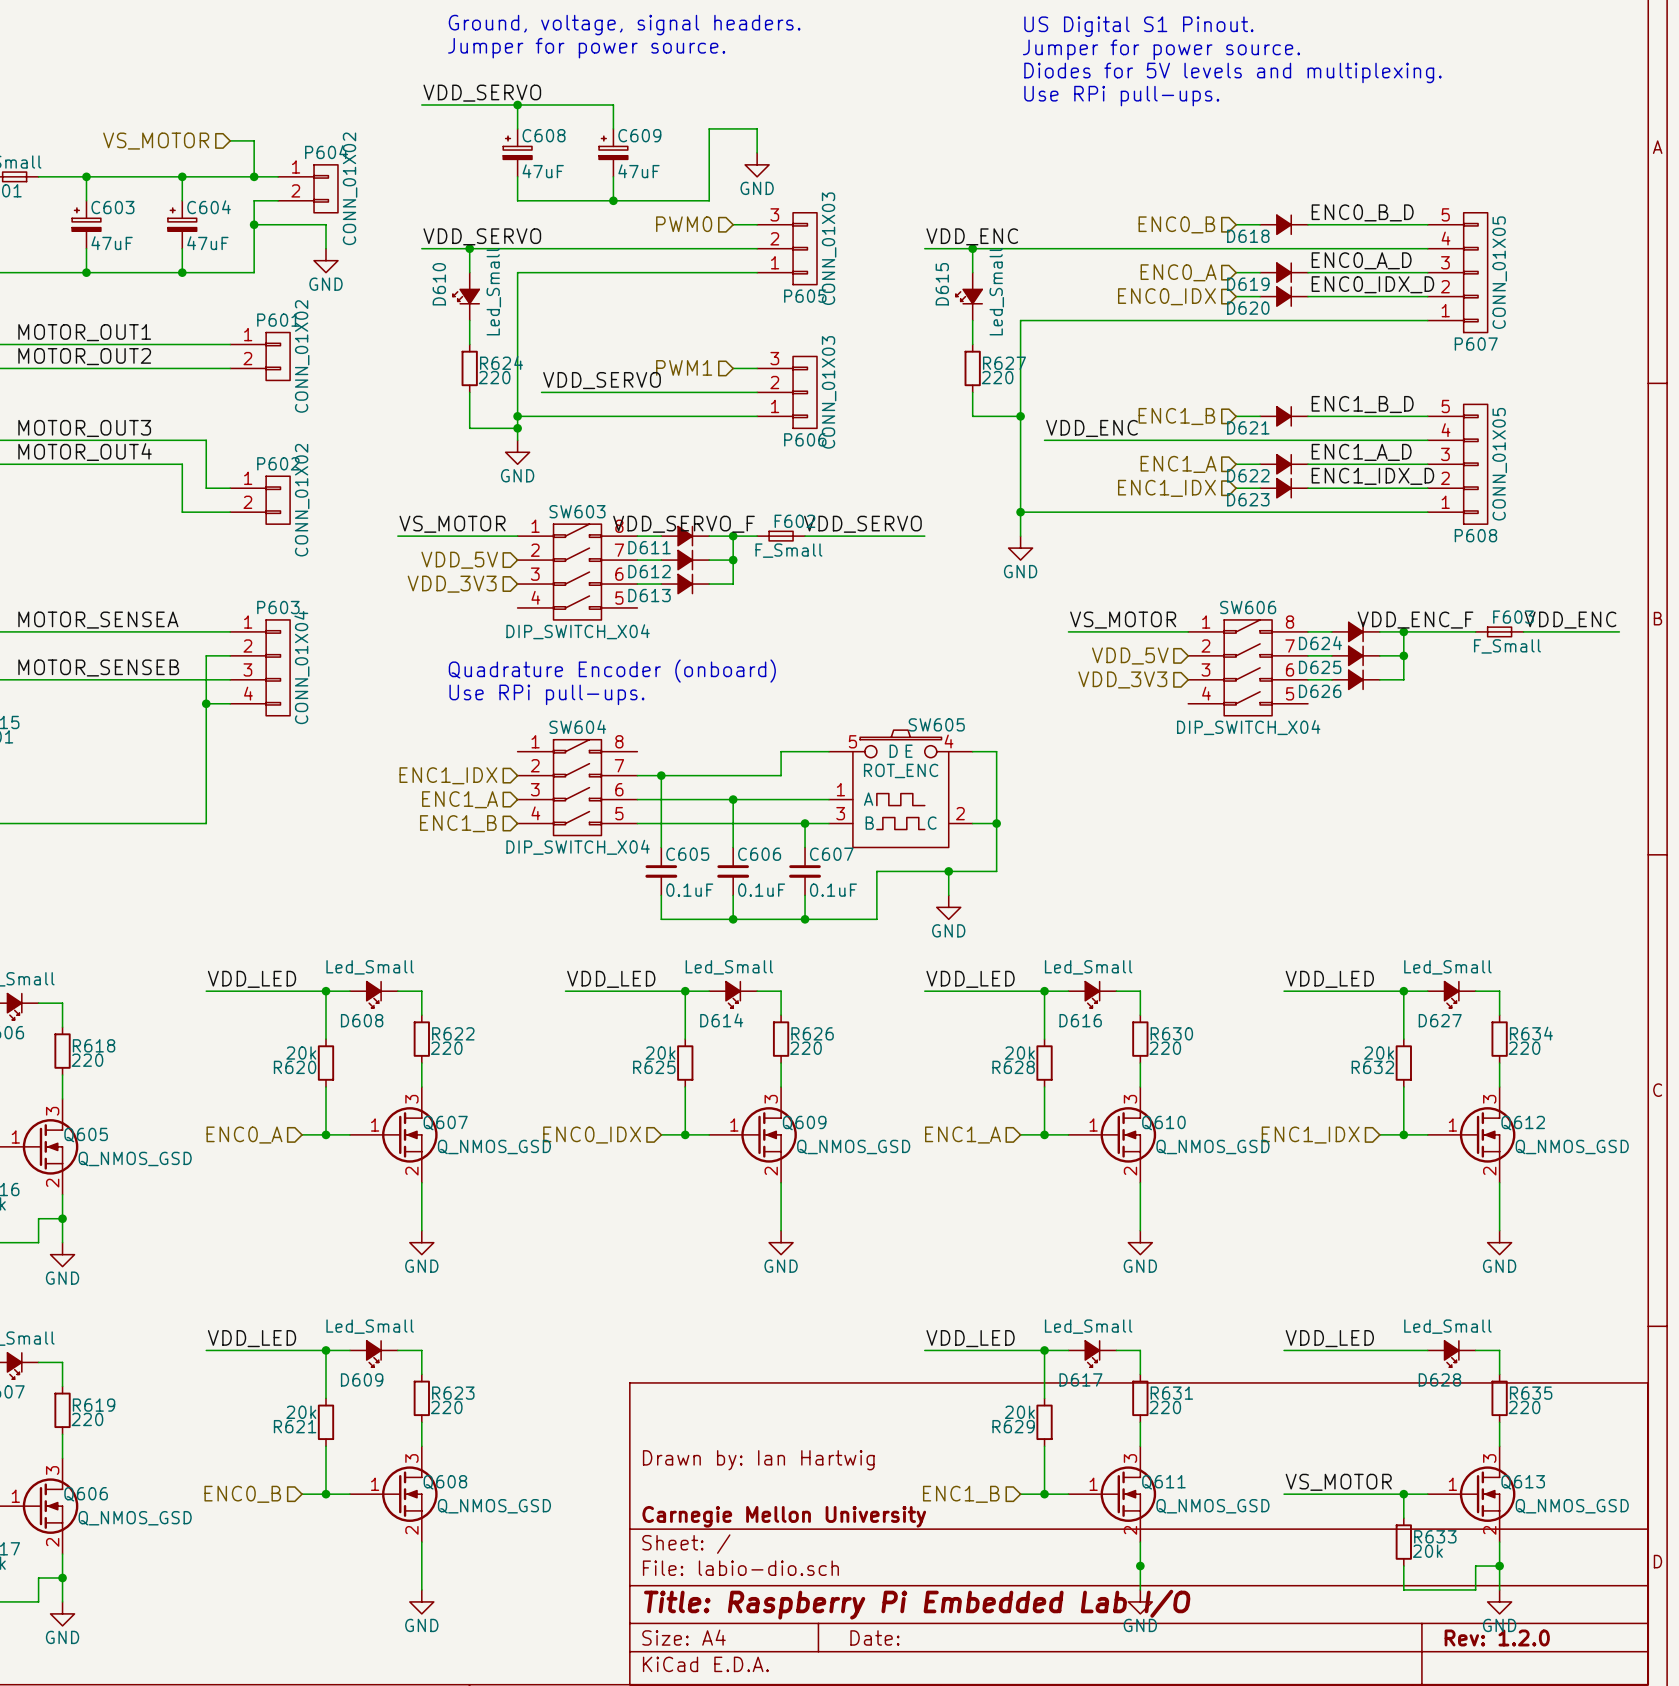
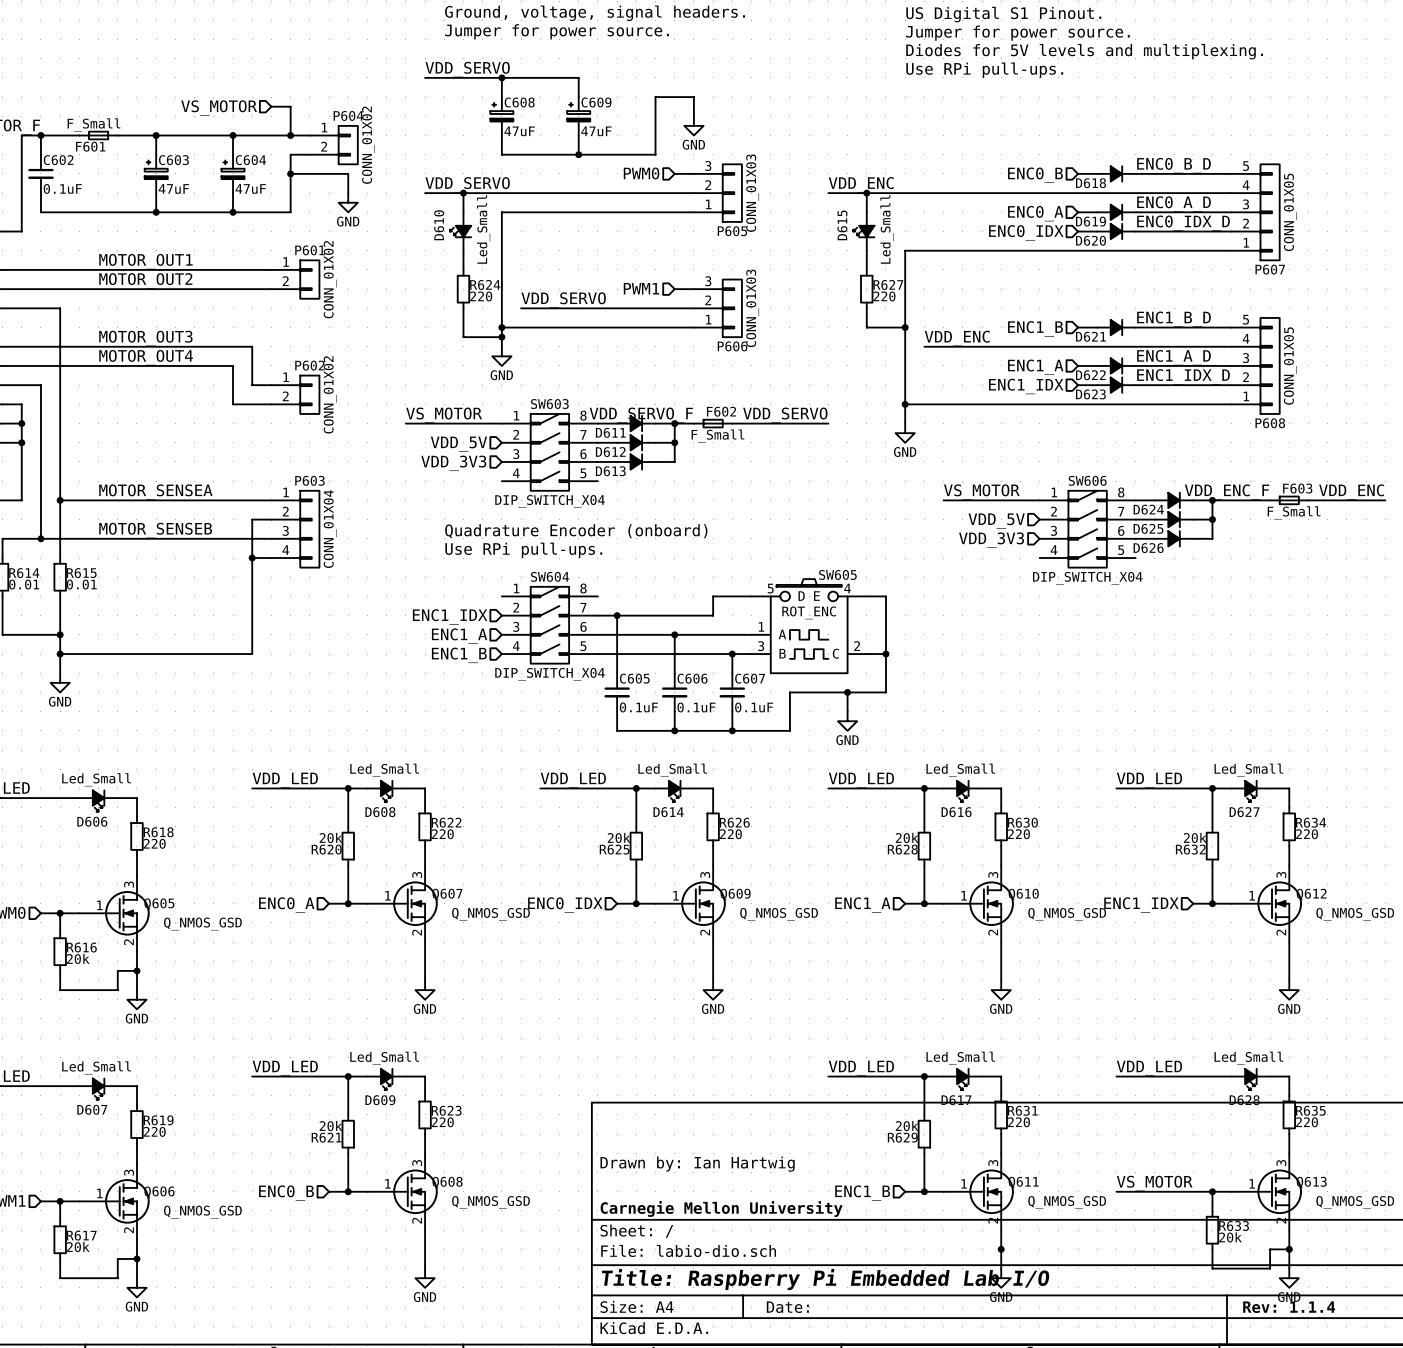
title block: Rev: 1.2.0 (1497, 1637) -> Rev: 1.1.4 (1289, 1307)

